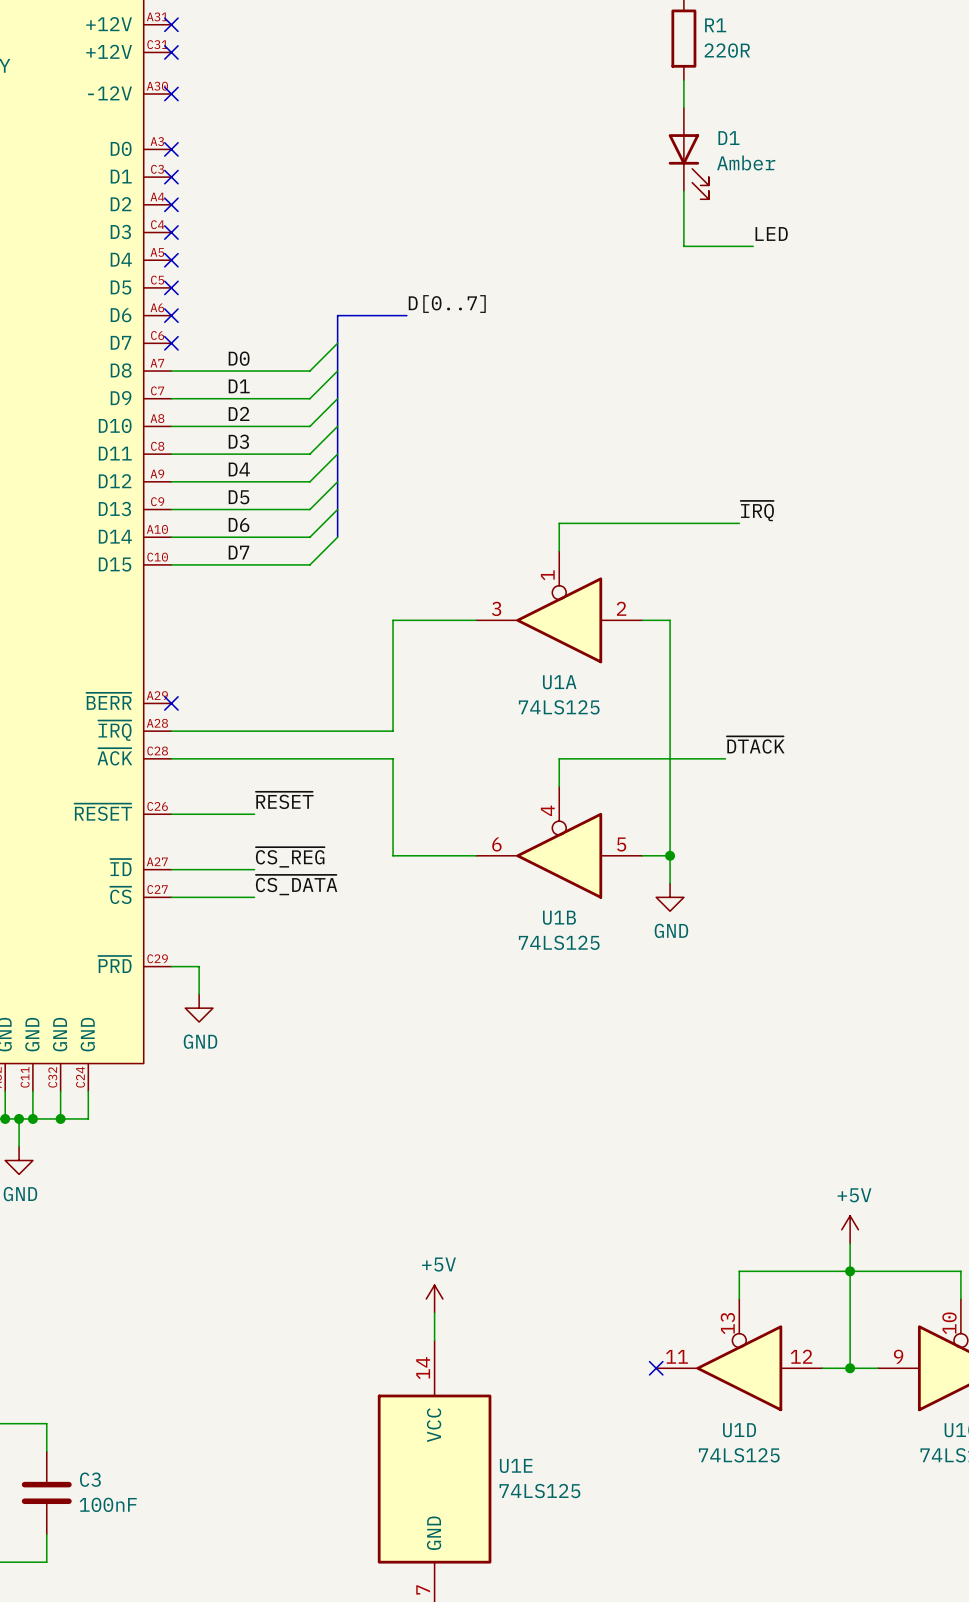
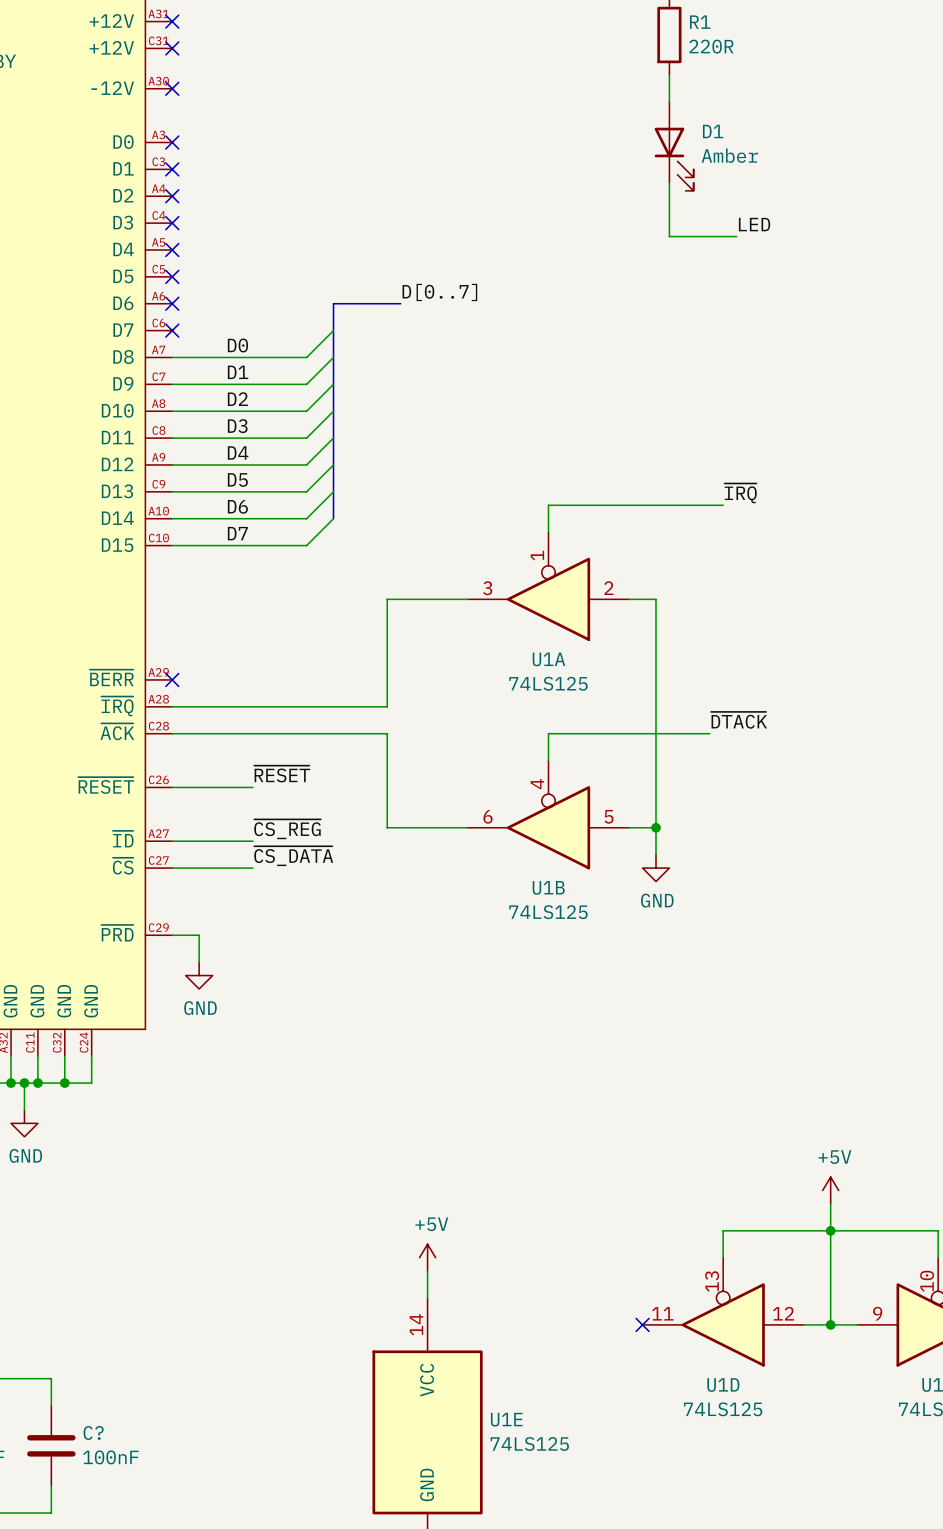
C3 name: C3 (90, 1479) -> C? (93, 1432)

